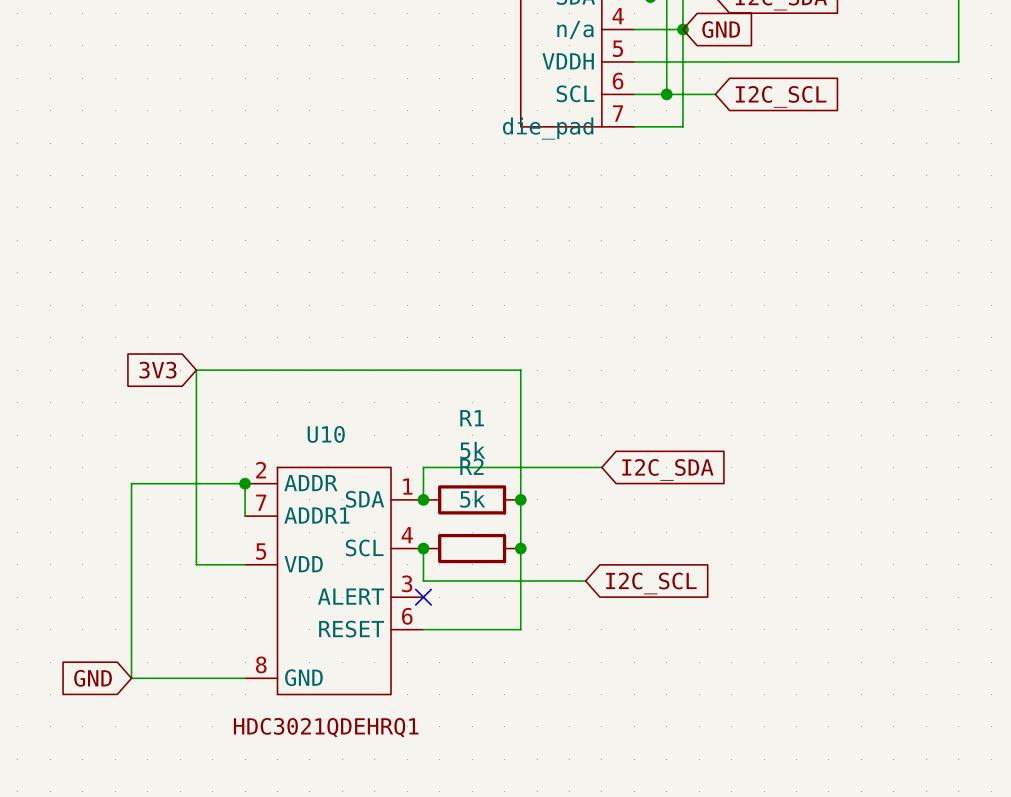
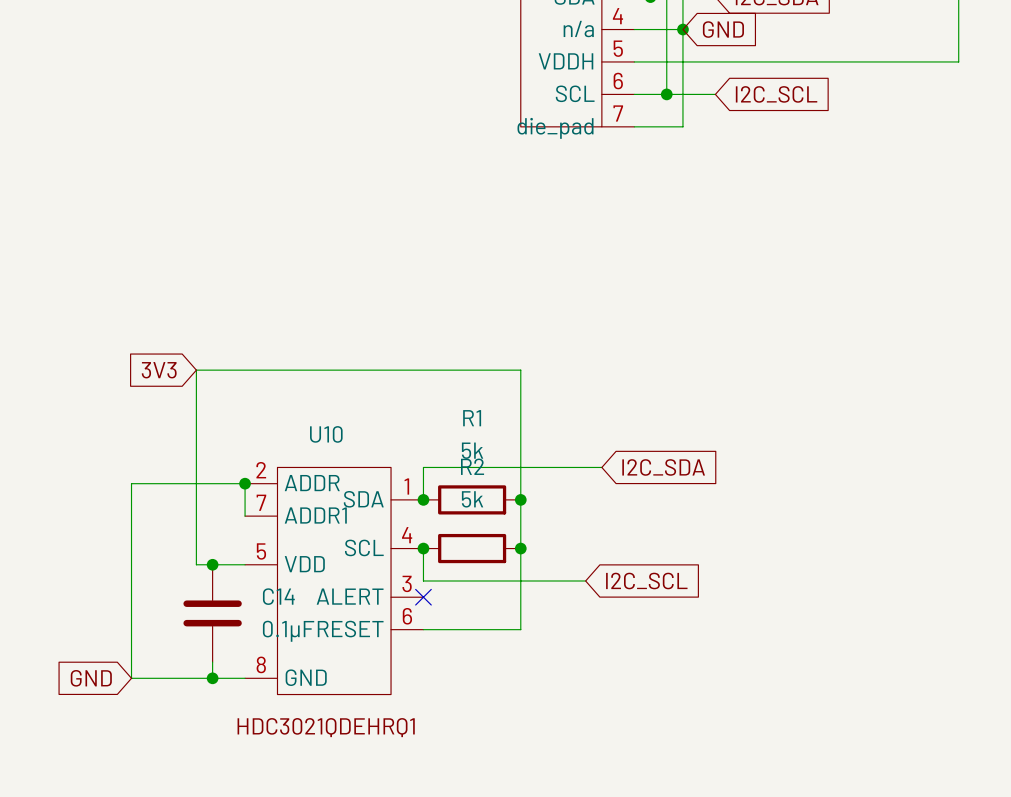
junction: none -> (212, 564)
C14: none -> 0.1µF (212, 613)
wire: none -> (212, 662) (212, 678)
junction: none -> (212, 678)

